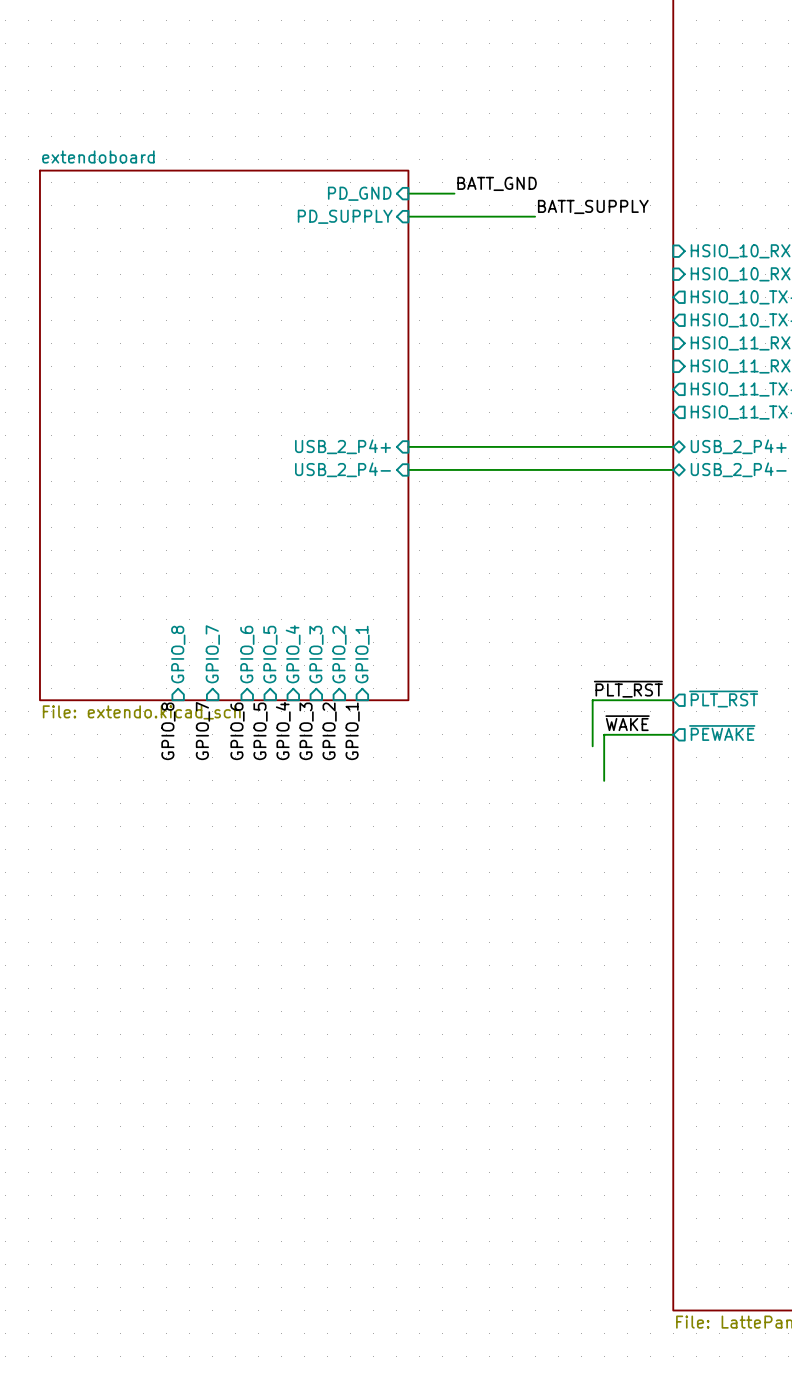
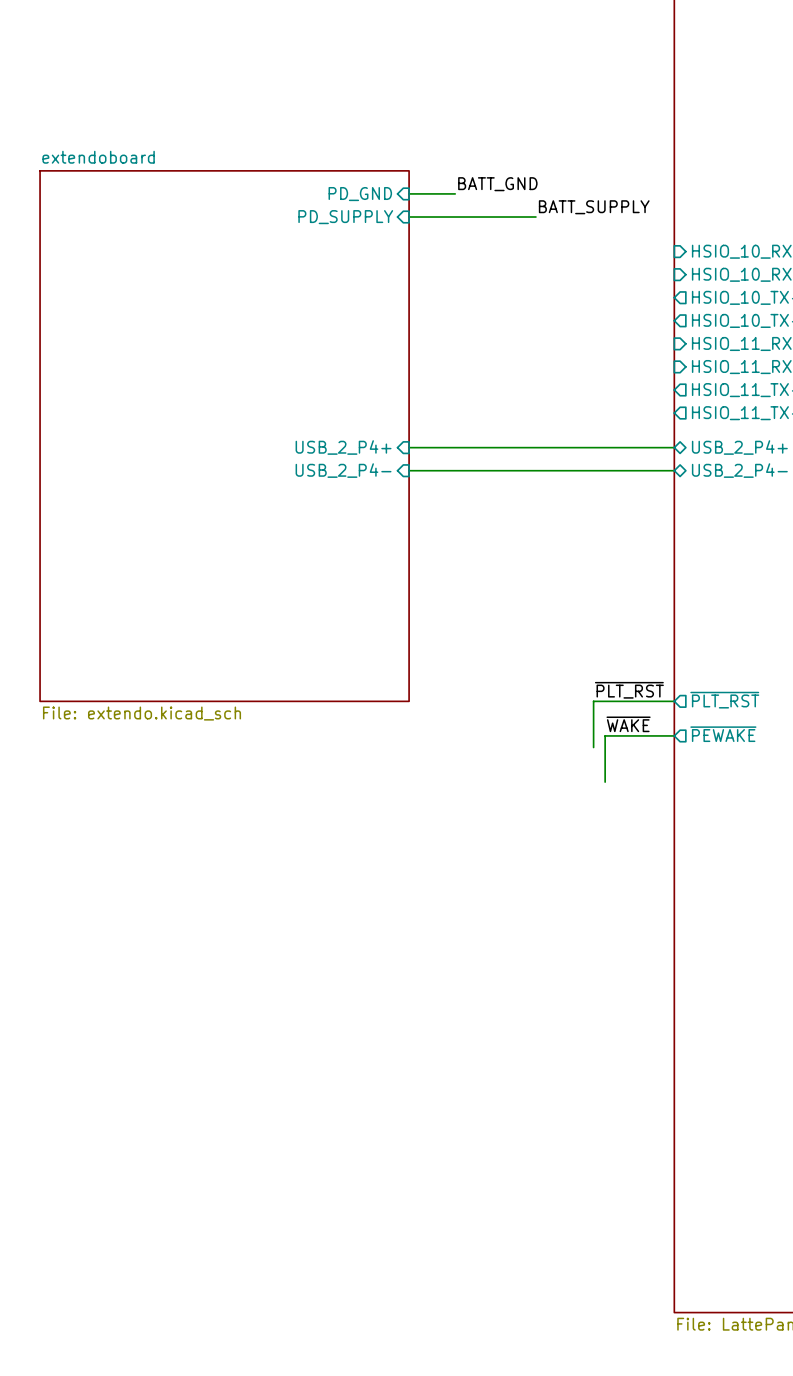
sheet pin: GPIO_8 (178, 654) -> none
sheet pin: GPIO_7 (212, 654) -> none
sheet pin: GPIO_6 (247, 654) -> none
sheet pin: GPIO_5 (270, 654) -> none
sheet pin: GPIO_4 (293, 654) -> none
sheet pin: GPIO_3 (316, 654) -> none
sheet pin: GPIO_2 (339, 654) -> none
sheet pin: GPIO_1 (362, 654) -> none
label: GPIO_8 (168, 731) -> none
label: GPIO_7 (202, 731) -> none
label: GPIO_6 (237, 731) -> none
label: GPIO_5 (260, 731) -> none
label: GPIO_4 (283, 731) -> none
label: GPIO_3 (306, 731) -> none
label: GPIO_2 (329, 731) -> none
label: GPIO_1 (352, 731) -> none

